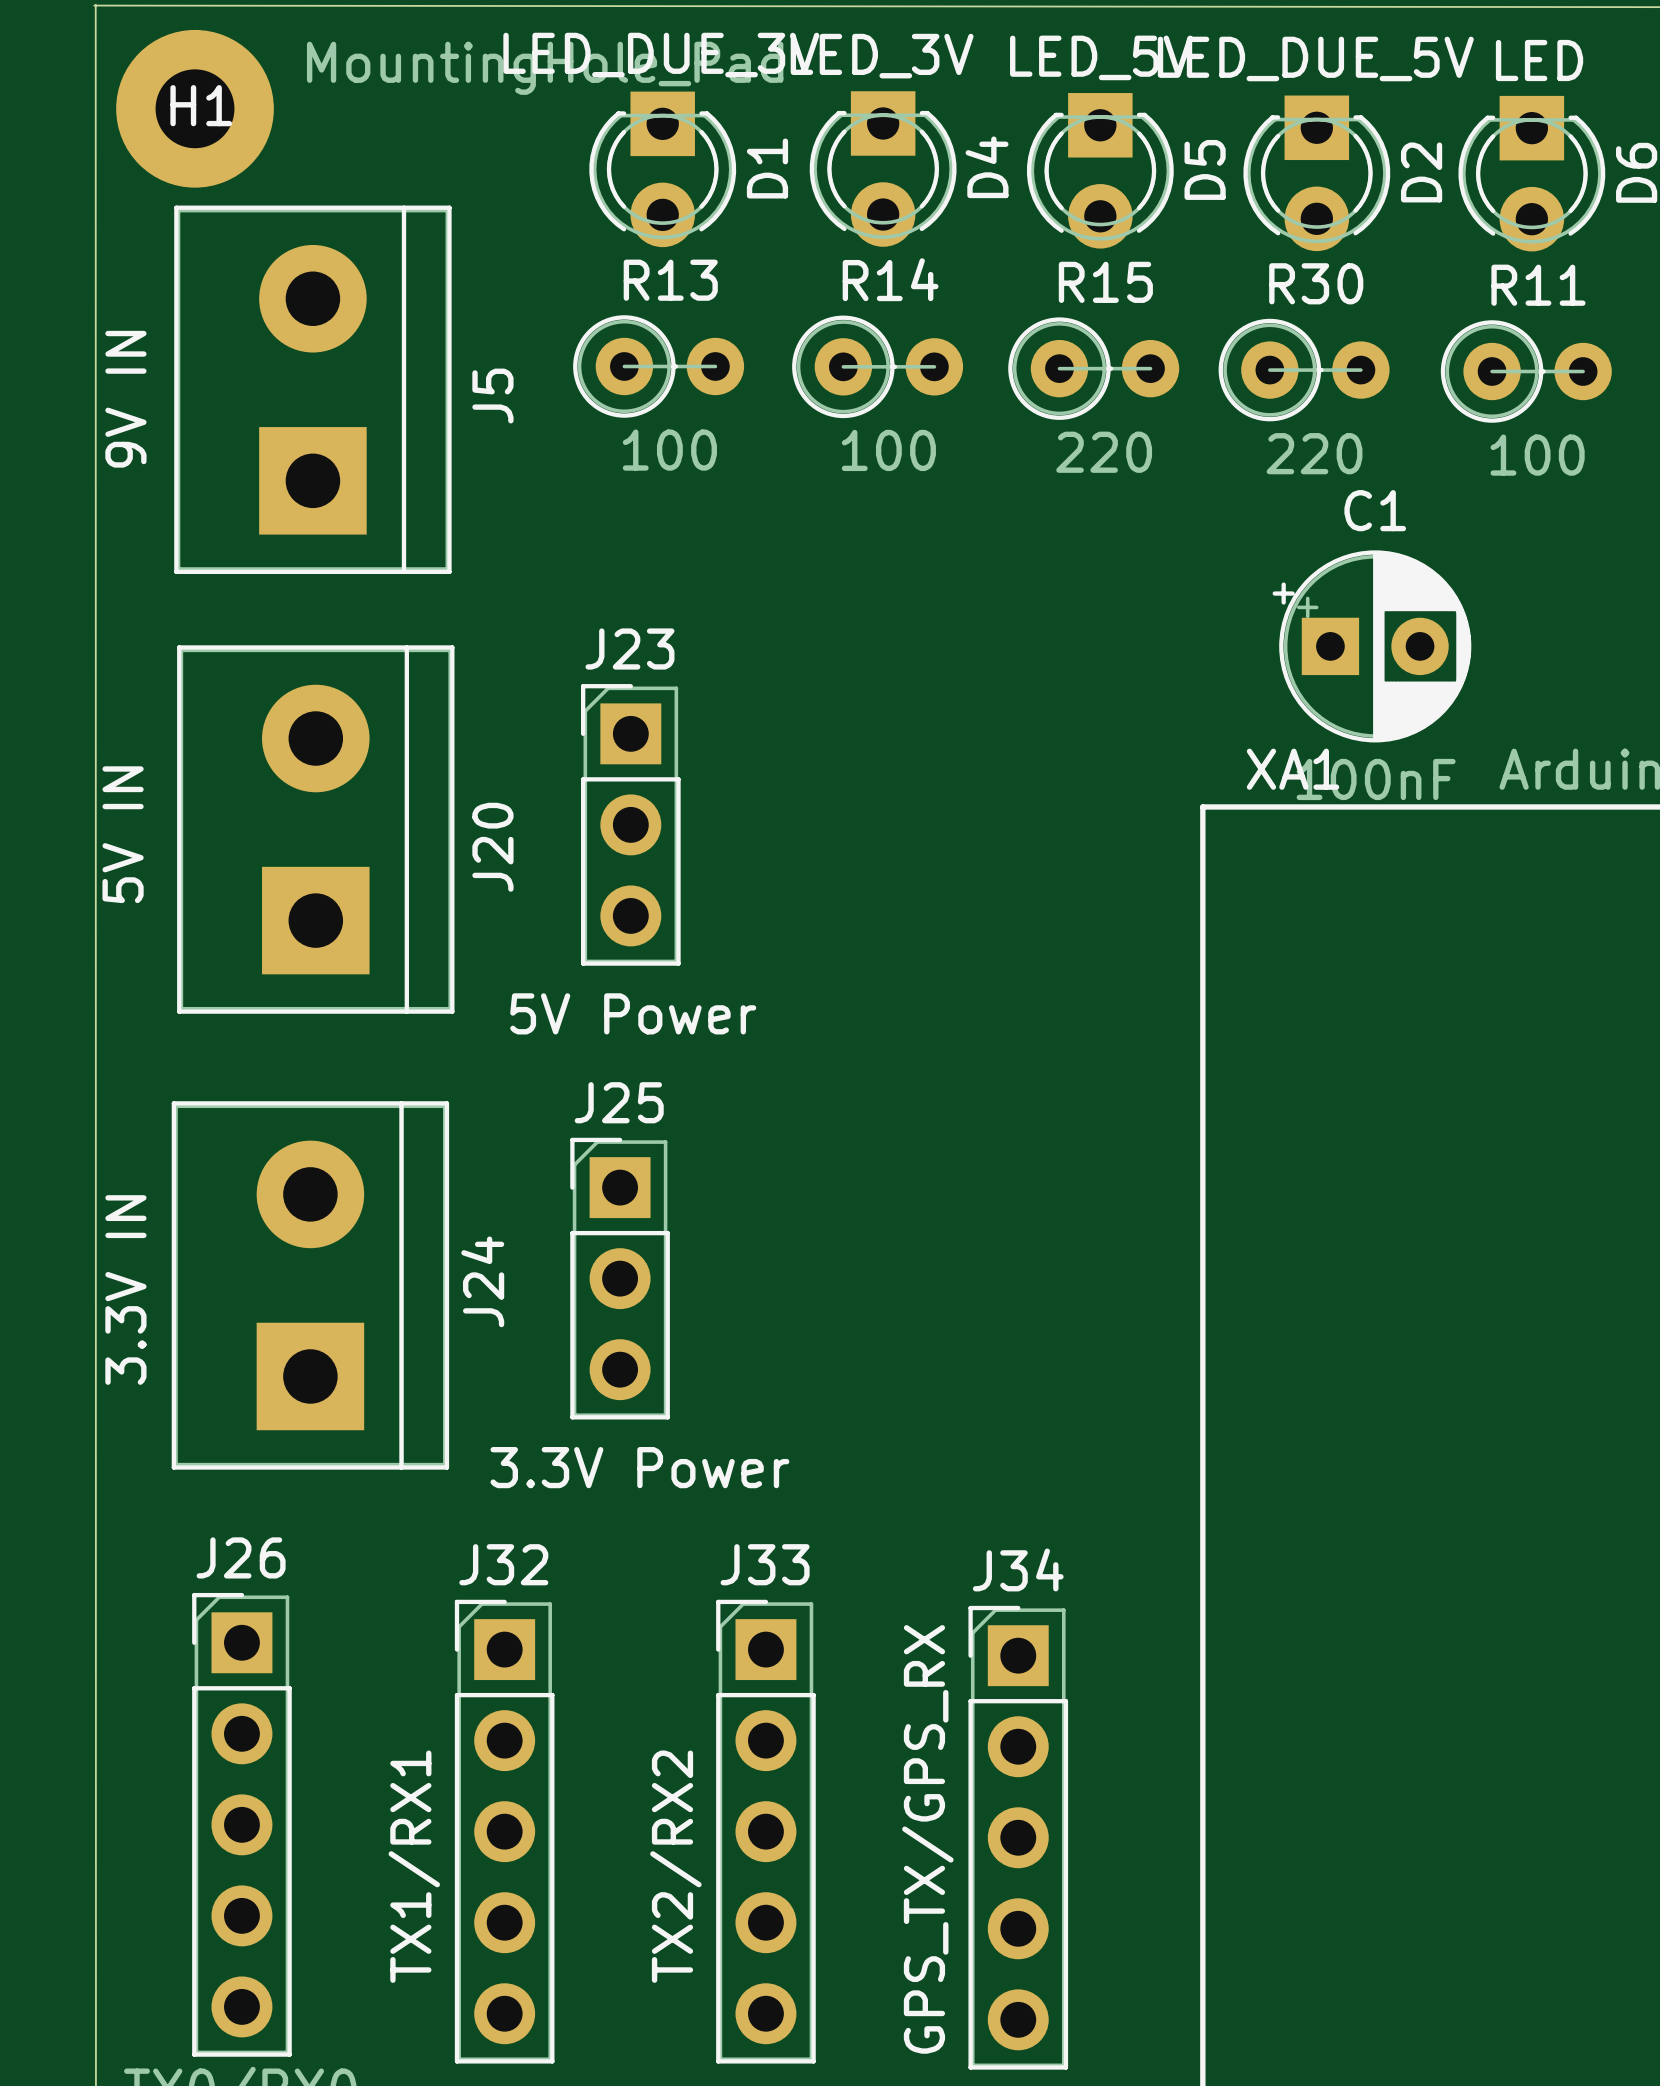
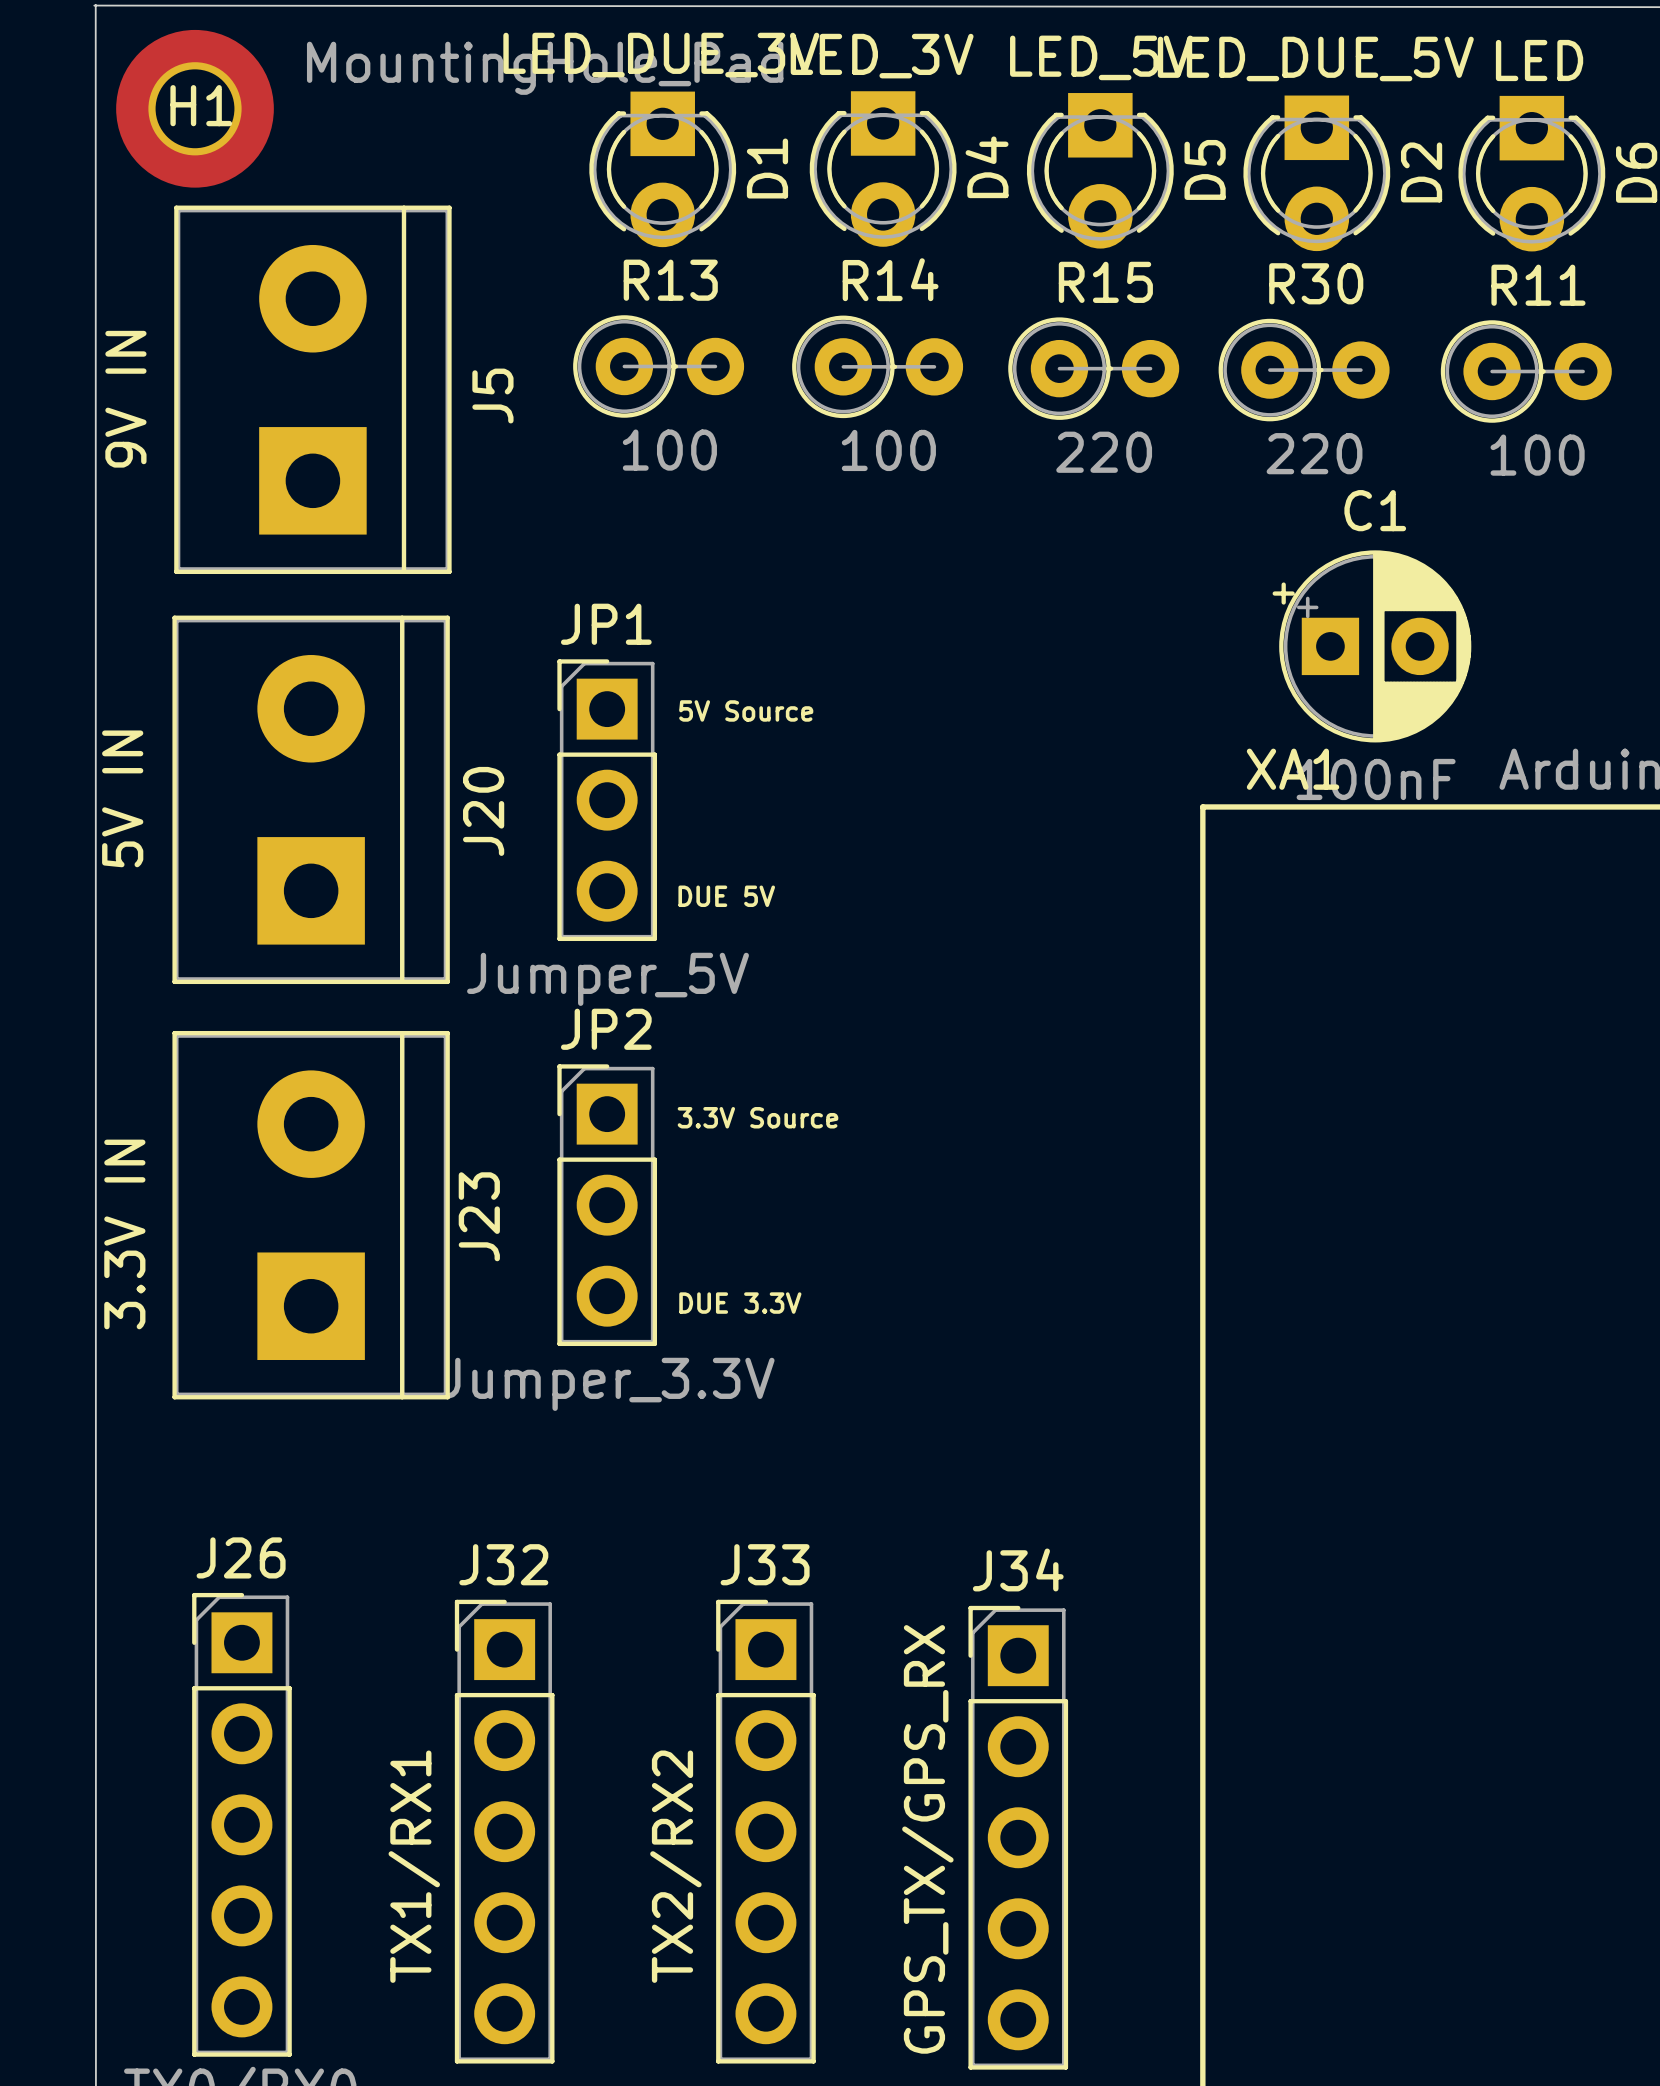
J23 name position: J23 (629, 649) -> J23 (479, 1216)
J23 footprint: [581, 684, 681, 966] -> [172, 1030, 450, 1400]
text: none -> 5V Source (746, 710)
JP1: none -> Jumper_5V (607, 800)
J20 position: (315, 829) -> (311, 799)
J20 value position: 5V IN (123, 834) -> 5V IN (122, 798)
J20 name position: J20 (492, 847) -> J20 (483, 811)
text: none -> DUE 5V (726, 896)
J23 value: 5V Power (633, 1013) -> 3.3V IN (124, 1234)
text: none -> 3.3V Source (757, 1117)
JP2: none -> Jumper_3.3V (607, 1205)
J25: 3.3V Power (620, 1278) -> none
J24: 3.3V IN (310, 1285) -> none
text: none -> DUE 3.3V (740, 1303)

